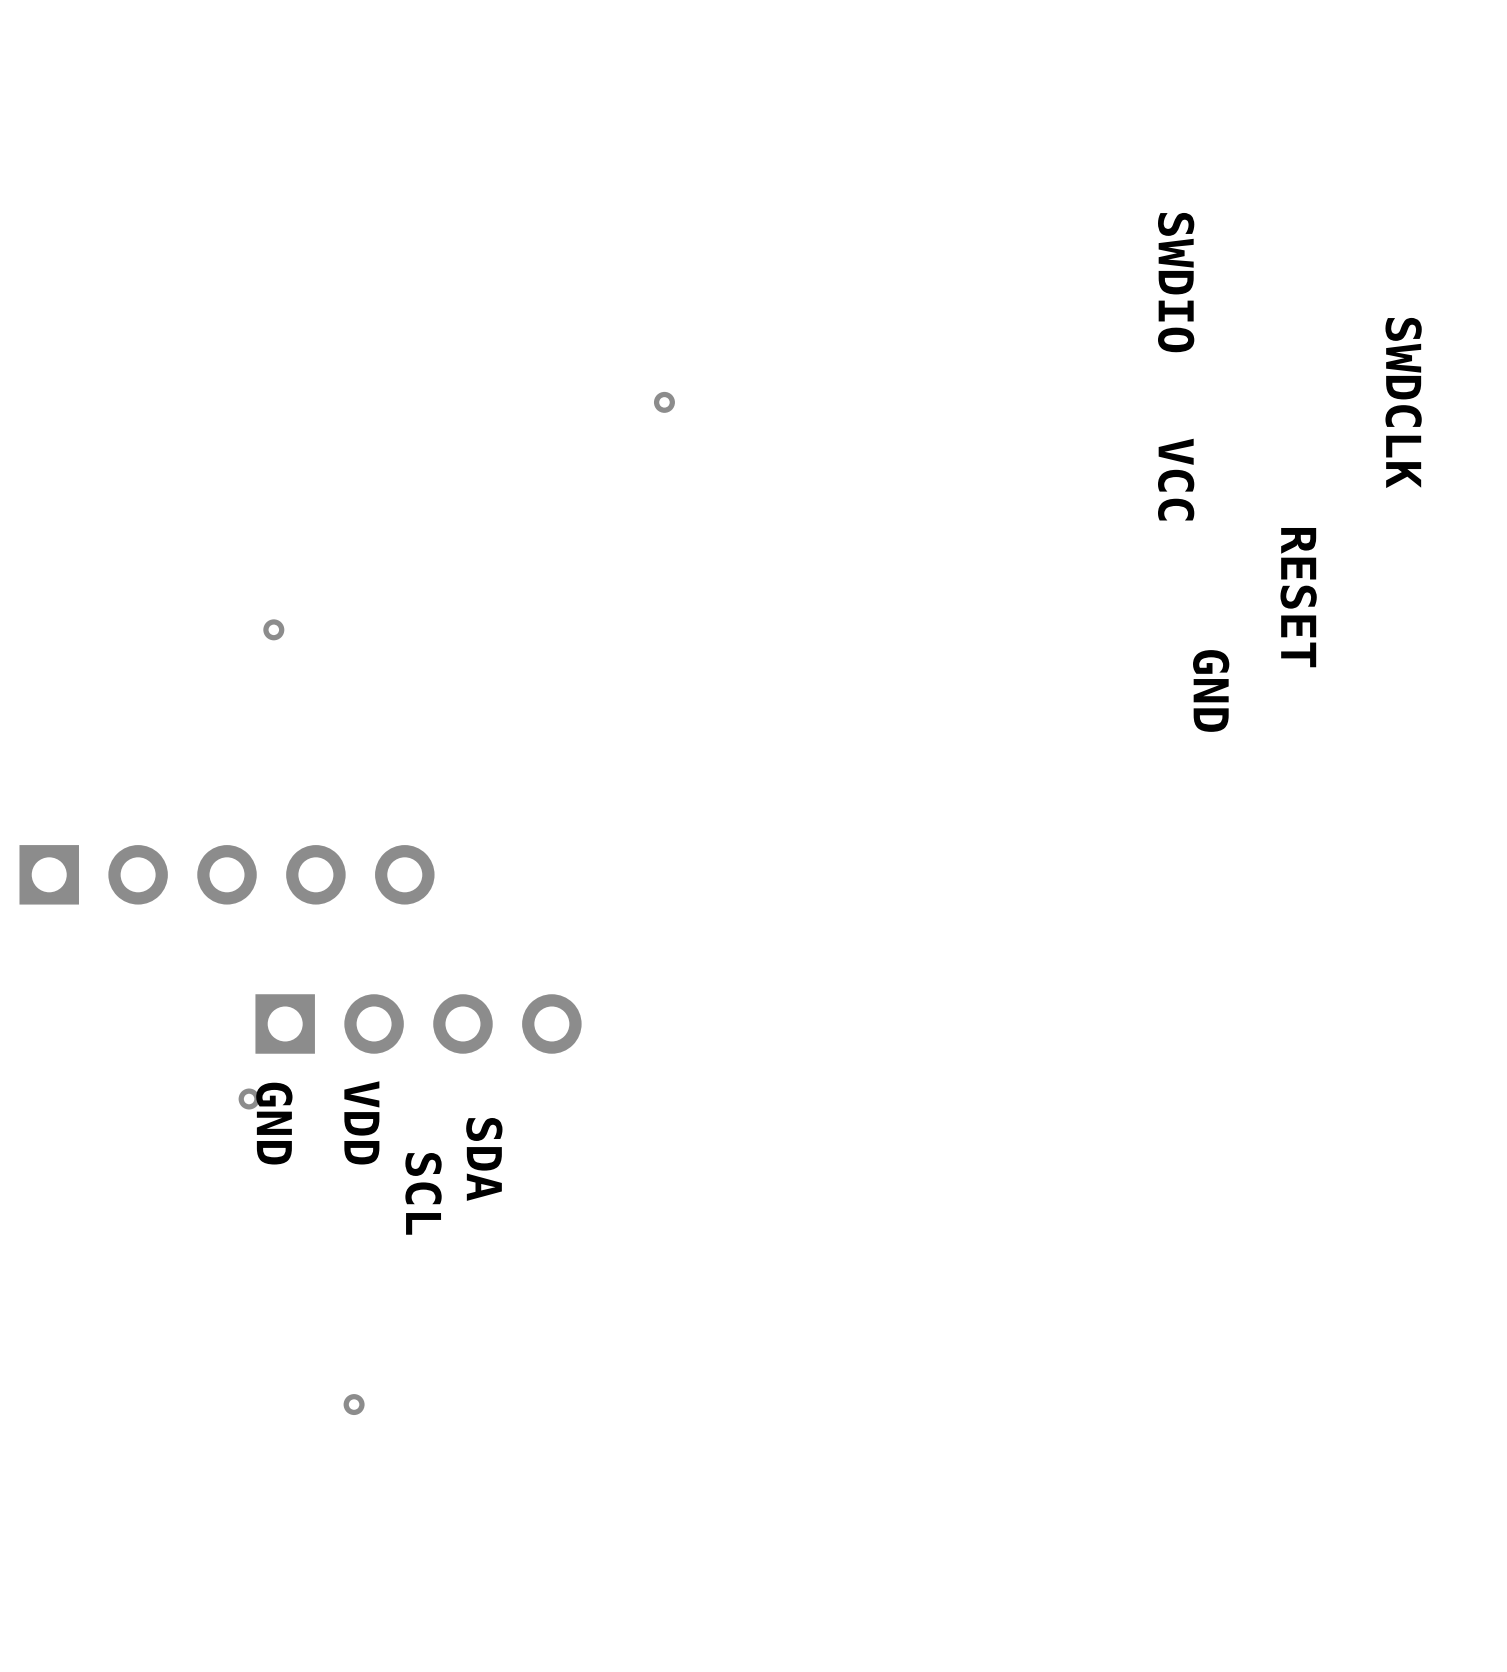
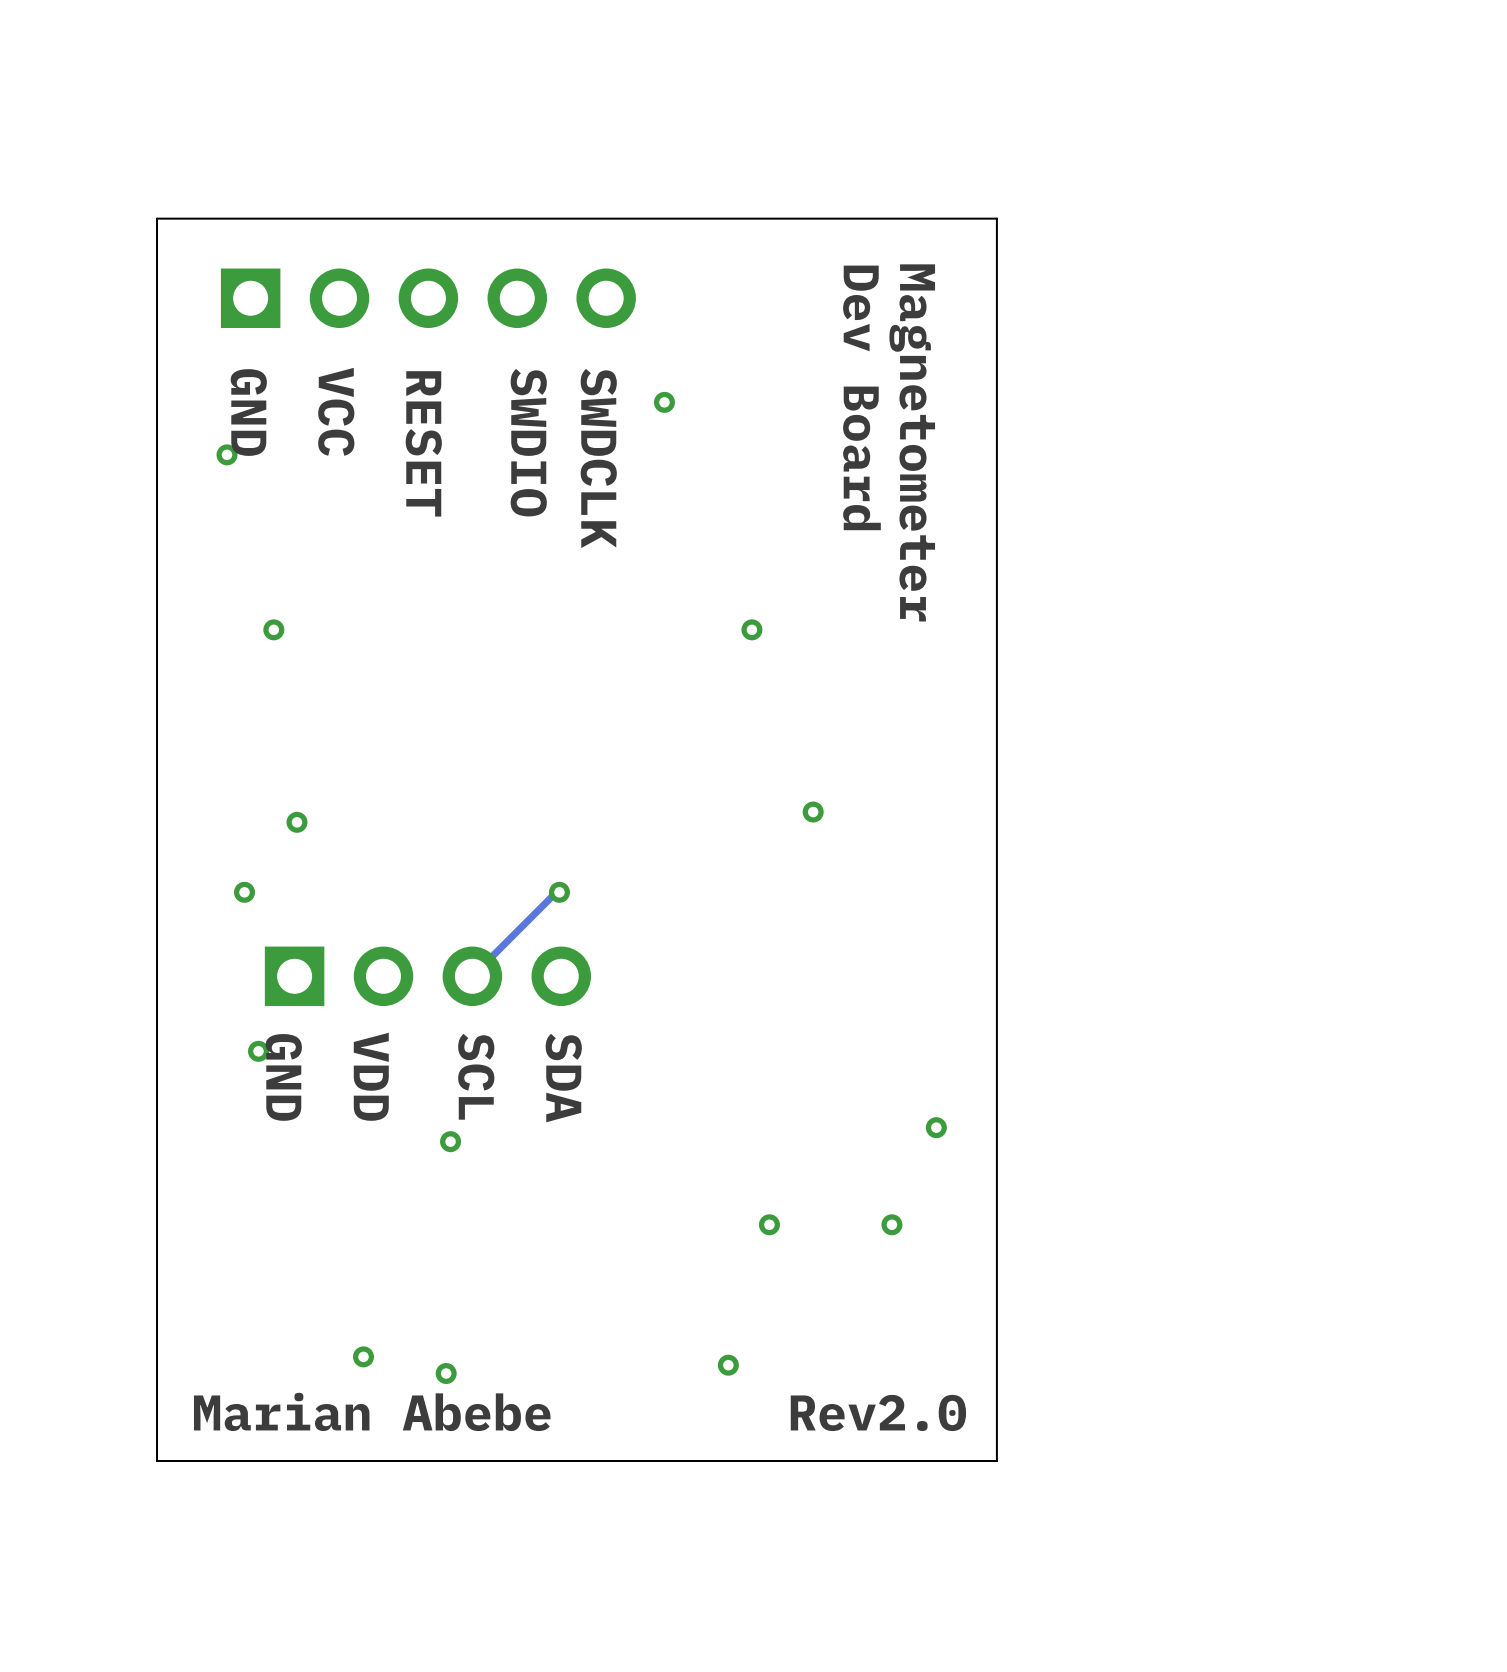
board edge: none -> (996, 218) (157, 218) (157, 1460) (996, 1460) (996, 218)
text position: SWDIO (1176, 282) -> SWDIO (528, 442)
text: none -> Dev Board (861, 397)
text position: SWDCLK (1403, 403) -> SWDCLK (598, 458)
text: none -> GND (248, 412)
text: none -> Magnetometer (912, 442)
text: none -> RESET (423, 443)
via: none -> (227, 454)
text position: VCC (1176, 479) -> VCC (336, 411)
text: RESET (1298, 597) -> none
via: none -> (751, 629)
text: GND (1211, 690) -> none
via: none -> (813, 812)
via: none -> (297, 822)
part position: (227, 874) -> (428, 298)
via: none -> (244, 892)
track: none -> (559, 892) (556, 892) (472, 976)
via: none -> (559, 892)
part position: (418, 1023) -> (427, 976)
via position: (249, 1099) -> (258, 1051)
text position: VDD (361, 1122) -> VDD (371, 1076)
text position: GND (274, 1123) -> GND (283, 1077)
via: none -> (936, 1127)
via: none -> (450, 1141)
text position: SDA (484, 1159) -> SDA (563, 1078)
text position: SCL (423, 1193) -> SCL (476, 1076)
via: none -> (769, 1224)
via: none -> (891, 1224)
via: none -> (363, 1356)
via: none -> (728, 1365)
via: none -> (446, 1373)
via: (354, 1404) -> none
text: none -> Marian Abebe (372, 1411)
text: none -> Rev2.0 (878, 1412)

